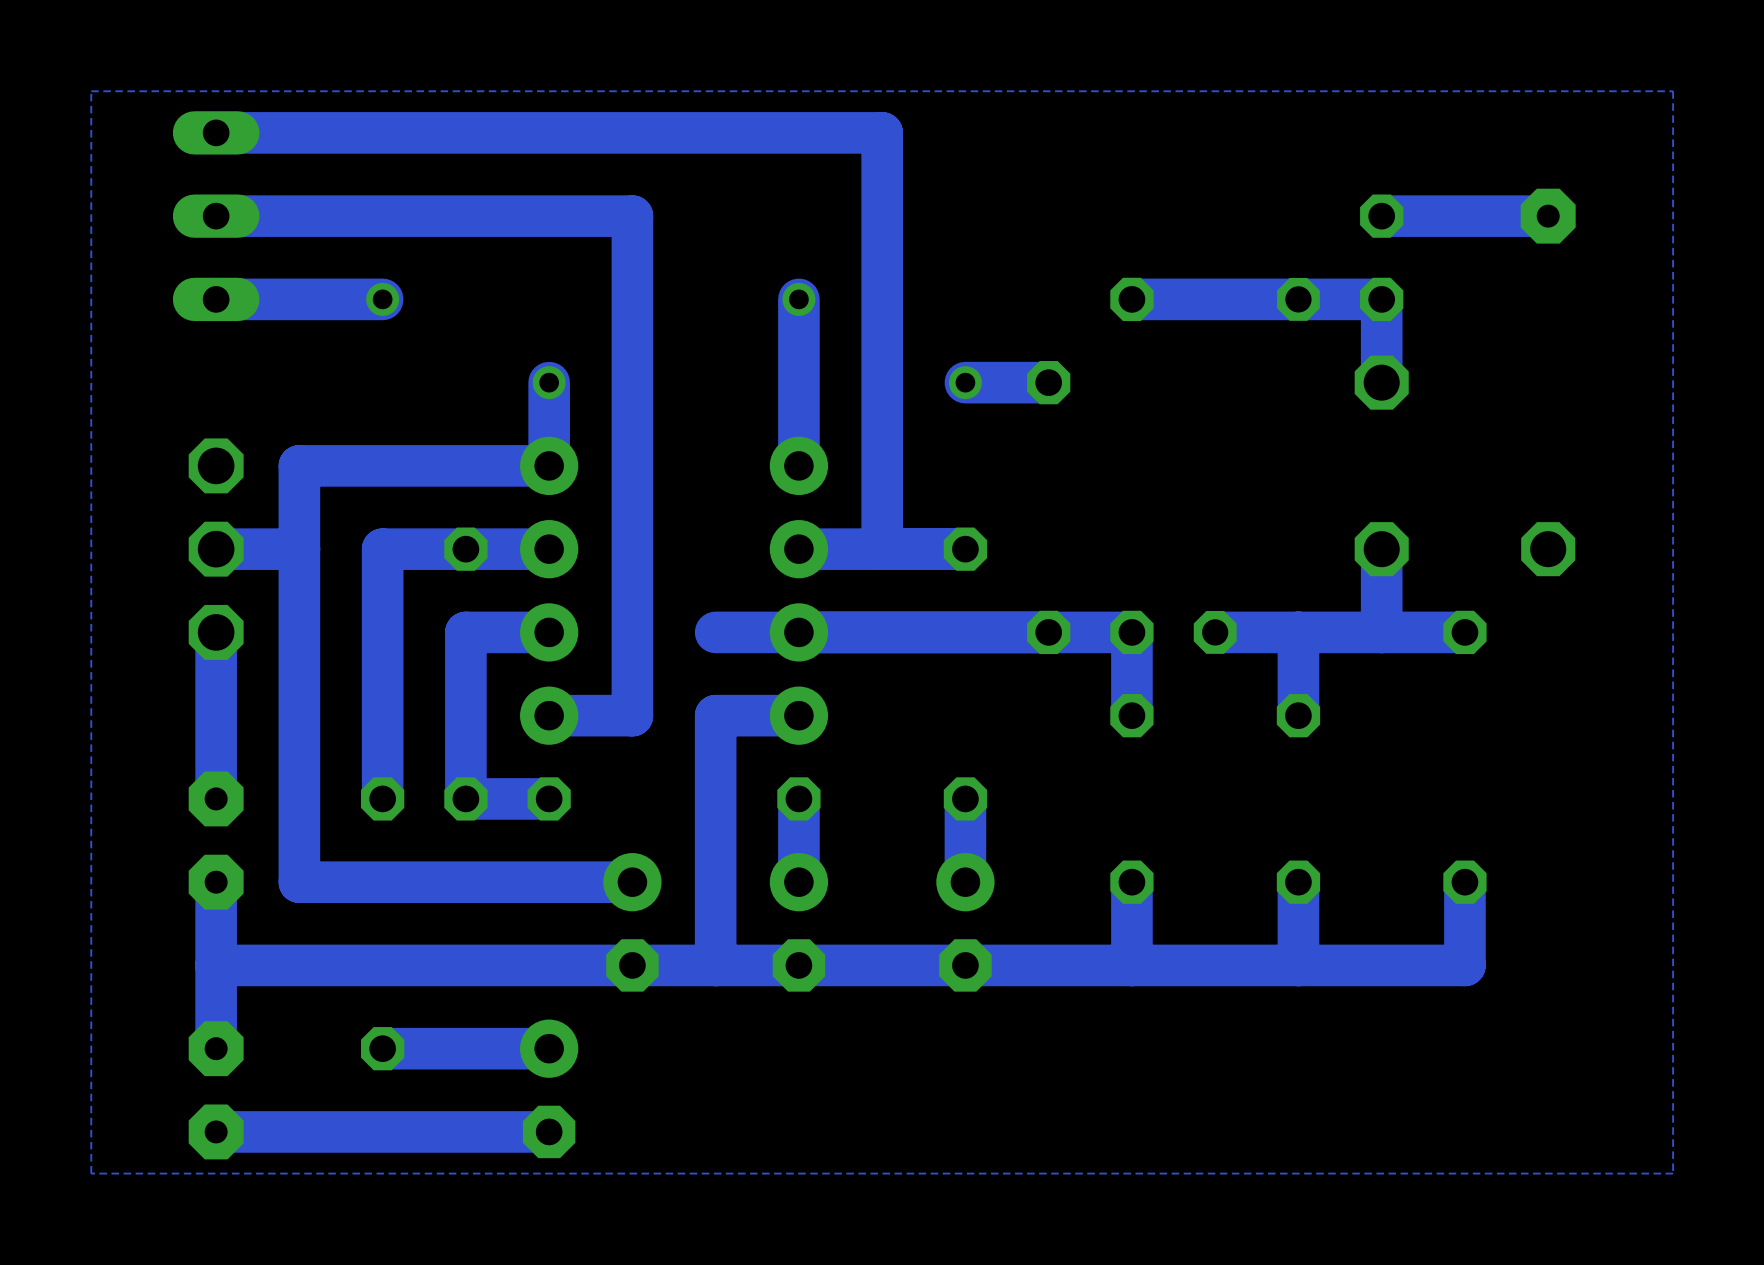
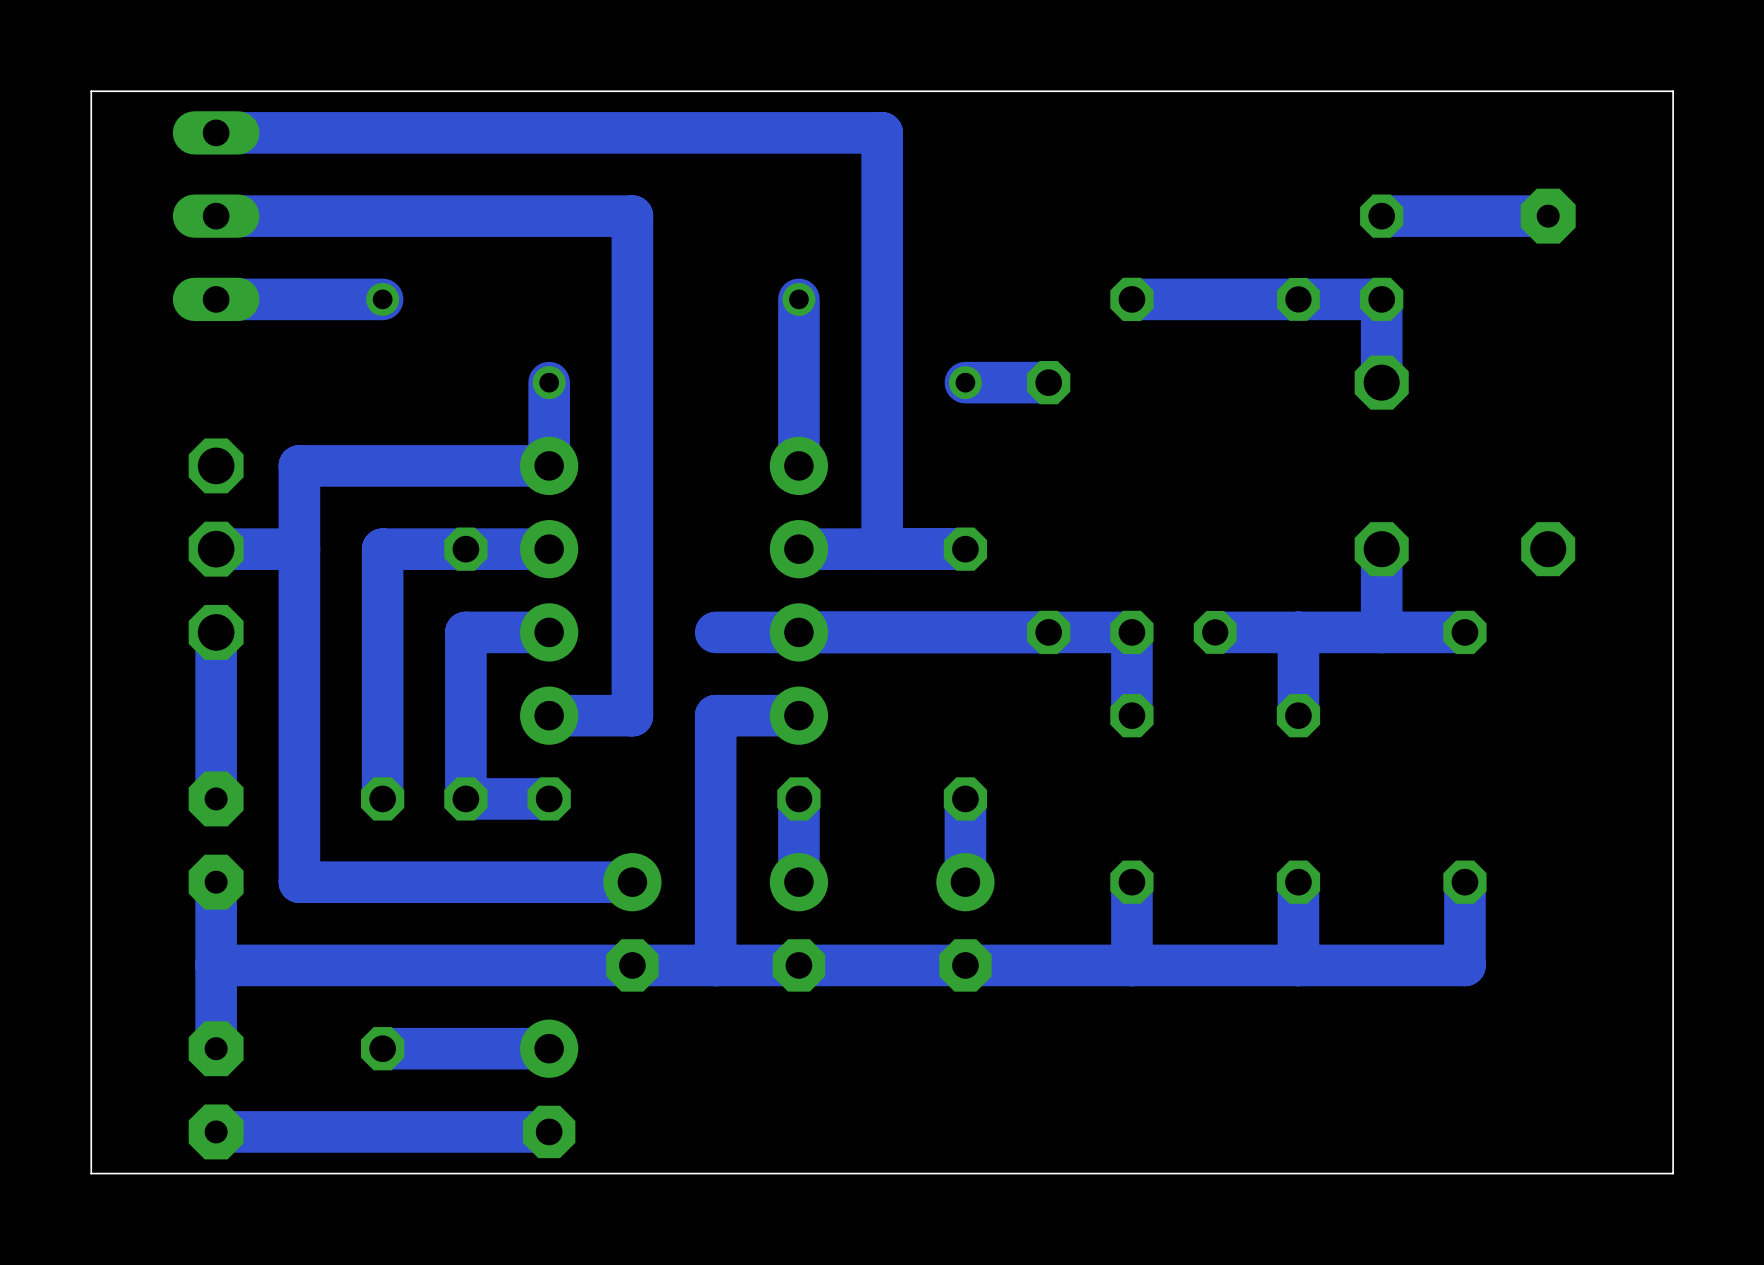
zone outline: (1673, 91) (1673, 1173) (91, 1173) (91, 91) (1673, 91) -> none
board edge: none -> (1673, 91) (91, 91) (91, 1173) (1673, 1173) (1673, 91)

